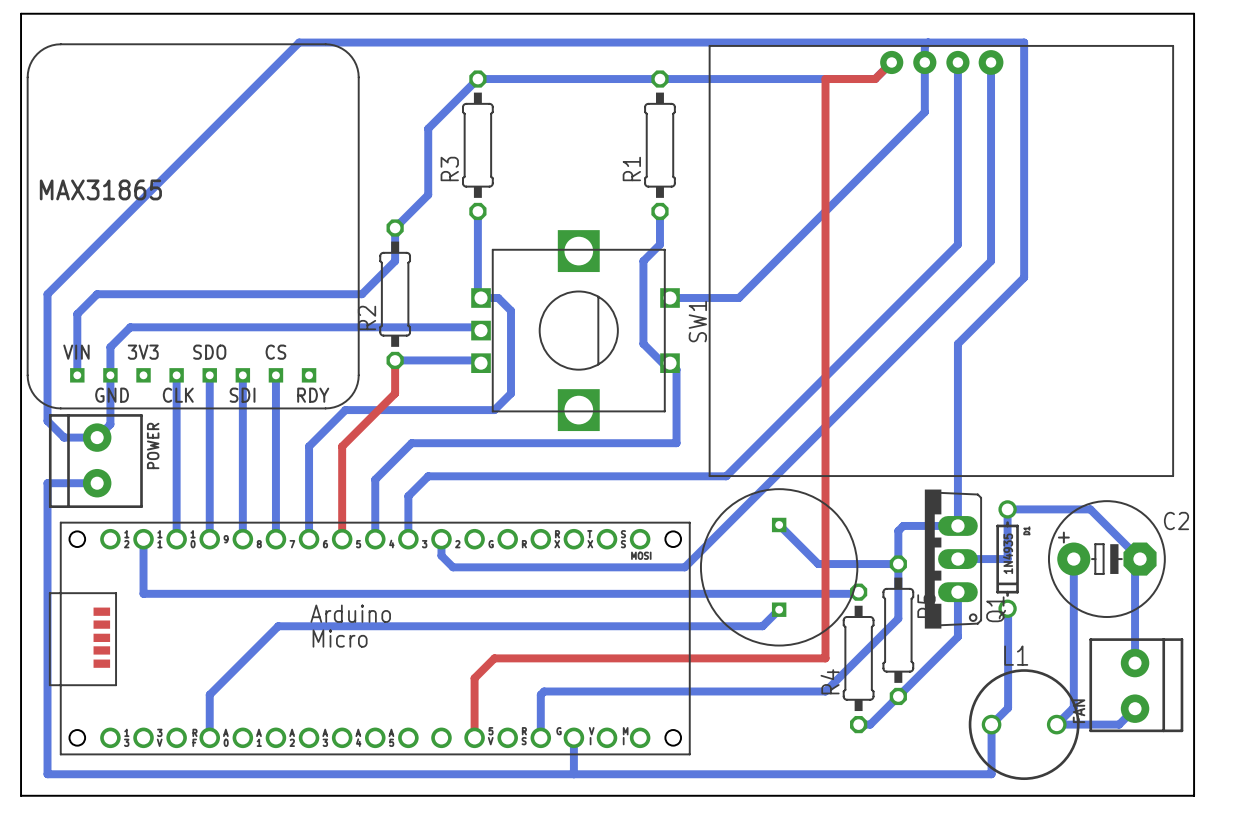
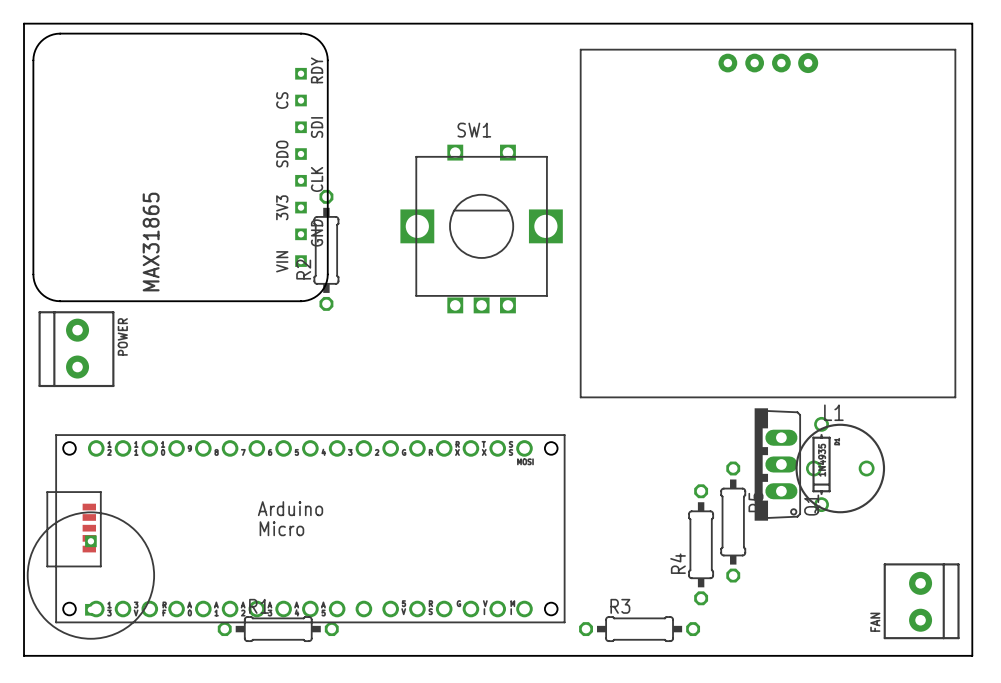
bottom track: (928, 42) (924, 45) (924, 112) (738, 298) (670, 298) -> none
bottom track: (891, 62) (875, 79) (477, 79) (428, 128) (428, 194) (395, 228) (395, 261) (362, 294) (97, 294) (77, 314) (77, 375) -> none
top track: (891, 62) (875, 79) (825, 79) (825, 658) (494, 658) (474, 678) (474, 737) -> none
bottom track: (957, 62) (957, 244) (726, 476) (428, 476) (408, 496) (408, 539) -> none
bottom track: (991, 62) (991, 261) (684, 567) (453, 567) (441, 555) (441, 539) -> none
R3 rotation: 0° (477, 145) -> 90° clockwise (639, 629)
R3 position: (477, 145) -> (639, 629)
R1 rotation: 0° (659, 145) -> 90° clockwise (278, 629)
R1 position: (659, 145) -> (278, 629)
part: none -> (180, 167)
bottom track: (477, 211) (477, 294) (481, 298) (498, 298) (511, 310) (511, 393) (494, 410) (345, 410) (309, 446) (309, 539) -> none
bottom track: (659, 211) (659, 244) (643, 261) (643, 343) (664, 365) (671, 365) -> none
part: (193, 226) -> none
bottom track: (481, 330) (477, 327) (130, 327) (110, 347) (110, 424) (97, 437) (64, 437) (47, 421) (47, 294) (299, 42) (1024, 42) (1024, 277) (957, 343) (957, 525) (903, 525) (898, 530) (898, 618) (825, 691) (544, 691) (540, 694) (540, 737) -> none
SW1 rotation: 0° (575, 330) -> 90° counterclockwise (481, 229)
bottom track: (395, 360) (478, 360) (481, 363) -> none
top track: (395, 360) (395, 393) (342, 446) (342, 539) -> none
bottom track: (670, 363) (676, 369) (676, 443) (411, 443) (375, 479) (375, 539) -> none
bottom track: (176, 375) (176, 539) -> none
bottom track: (209, 375) (209, 539) -> none
bottom track: (242, 375) (242, 539) -> none
bottom track: (275, 375) (275, 539) -> none
POWER position: (95, 461) -> (76, 349)
bottom track: (97, 483) (47, 483) (47, 774) (991, 774) (991, 724) (1008, 708) (1007, 608) -> none
bottom track: (779, 524) (818, 564) (898, 564) -> none
bottom track: (143, 539) (143, 593) (856, 593) (858, 592) -> none
bottom track: (957, 559) (1007, 559) (1007, 509) (1090, 509) (1140, 559) (1135, 564) (1135, 663) -> none
bottom track: (1073, 559) (1073, 707) (1056, 724) (1119, 724) (1135, 708) -> none
C2: (1106, 559) -> none
part: (779, 567) -> none
bottom track: (957, 592) (957, 636) (870, 724) (858, 724) -> none
bottom track: (779, 609) (762, 626) (278, 626) (209, 694) (209, 737) -> none
FAN position: (1136, 685) -> (921, 601)
part: none -> (90, 575)
L1 position: (1024, 724) -> (840, 468)
bottom track: (573, 737) (573, 774) -> none

